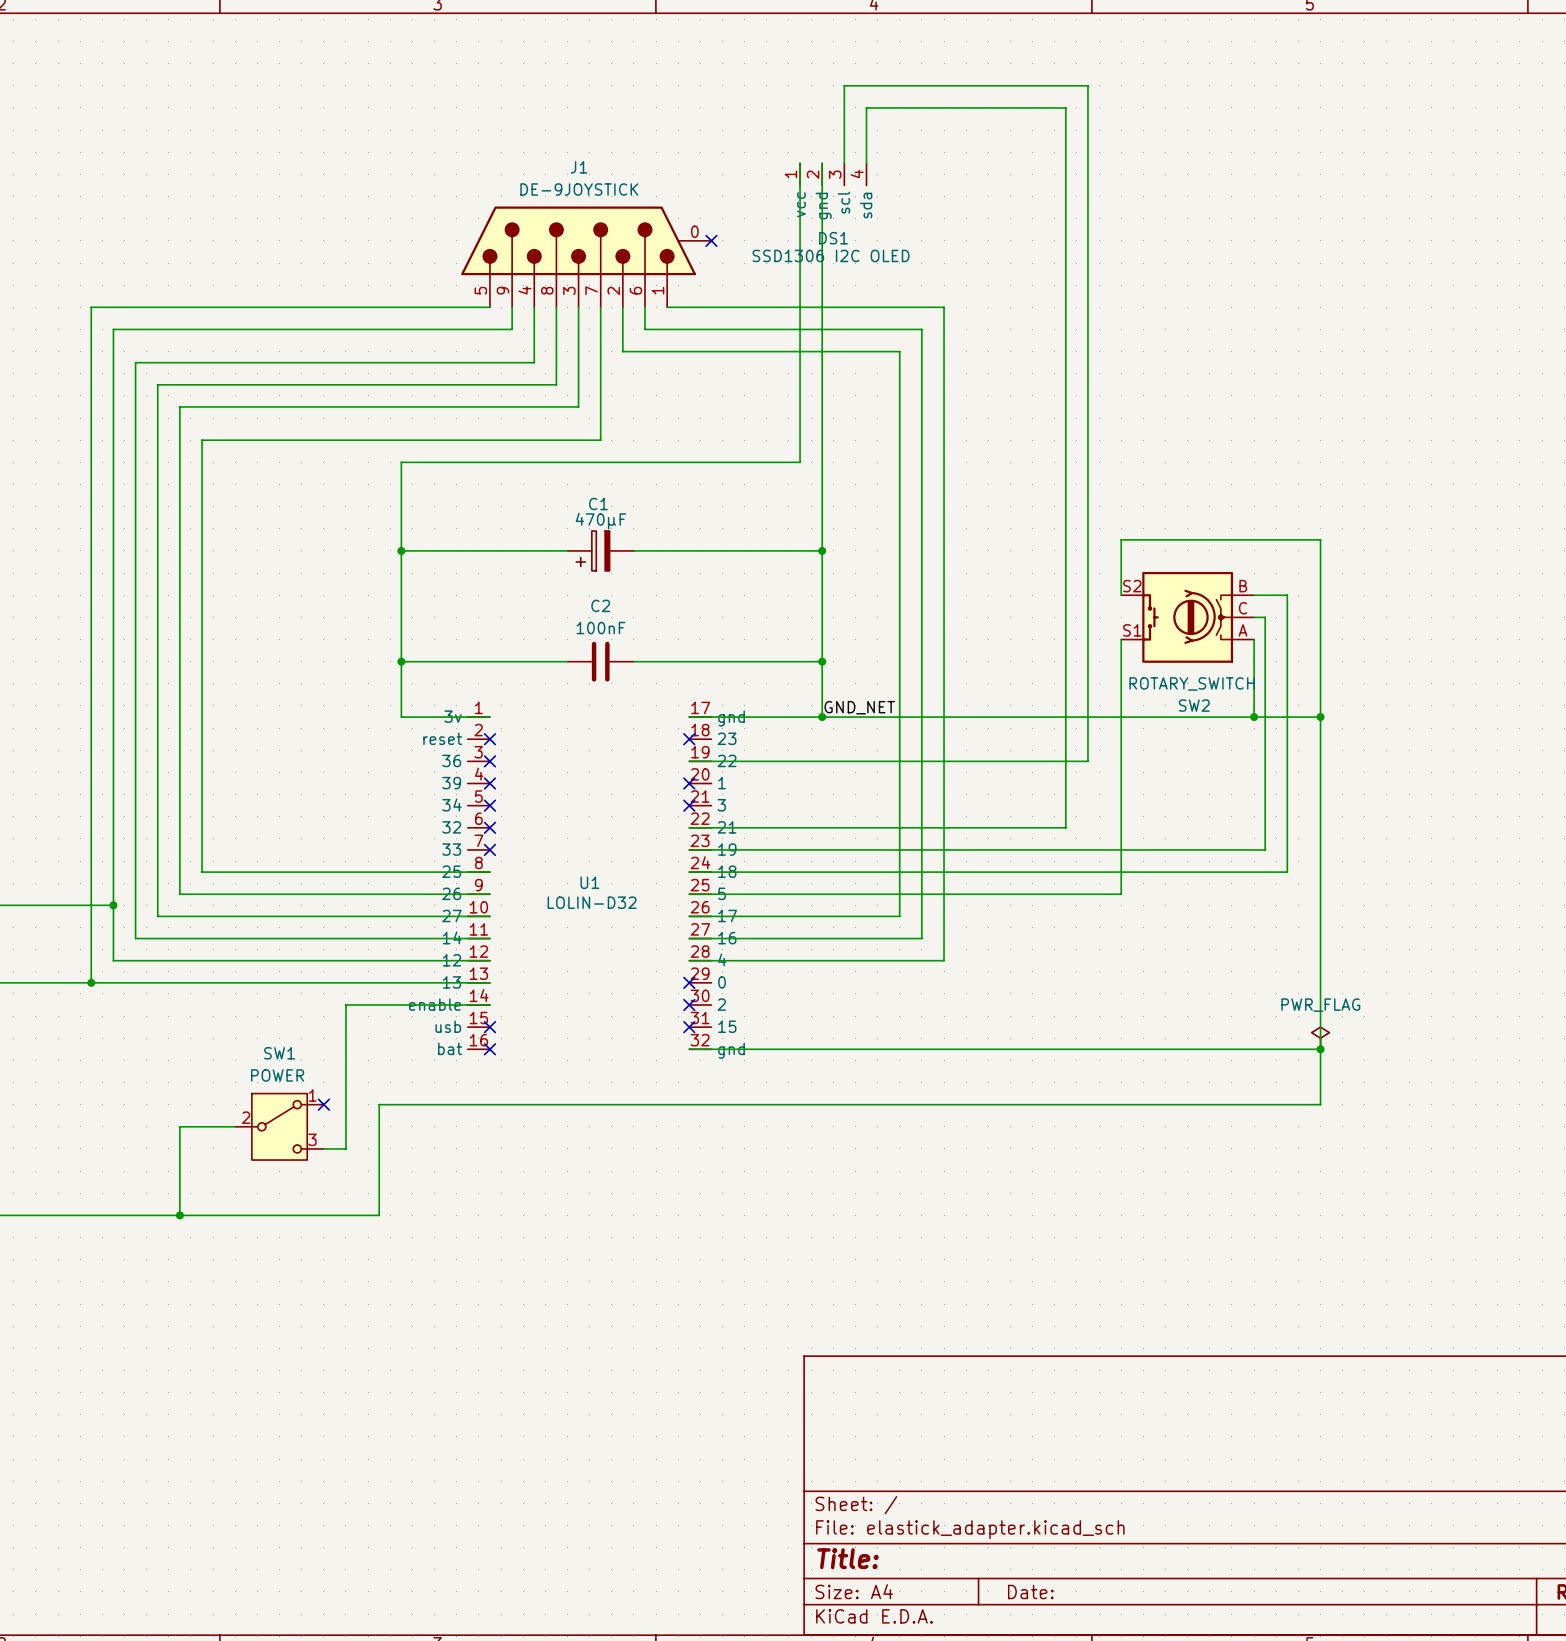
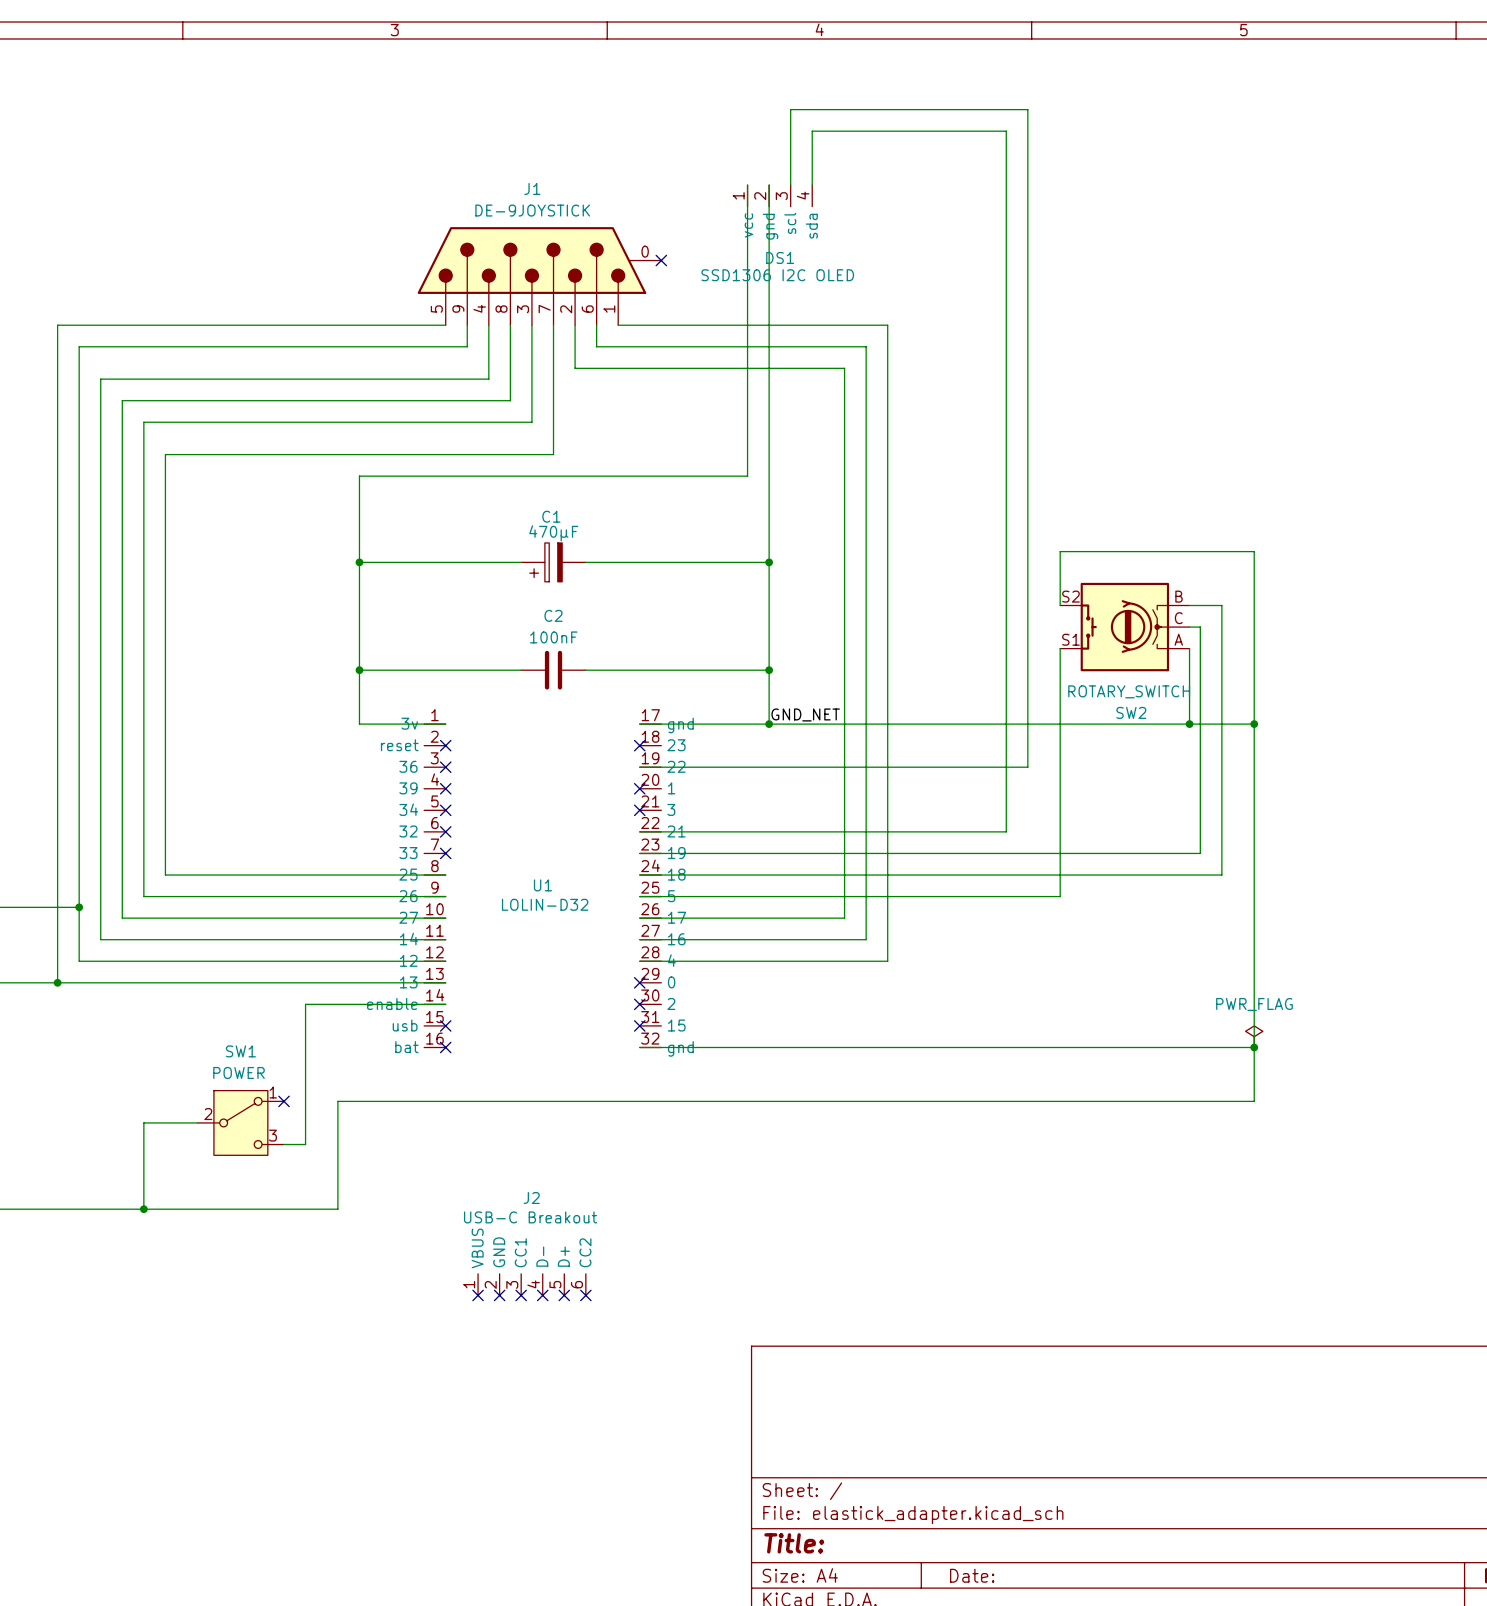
J2: none -> USB-C Breakout (531, 1284)
no-connect mark: none -> (478, 1295)
no-connect mark: none -> (499, 1295)
no-connect mark: none -> (521, 1295)
no-connect mark: none -> (542, 1295)
no-connect mark: none -> (564, 1295)
no-connect mark: none -> (585, 1295)

